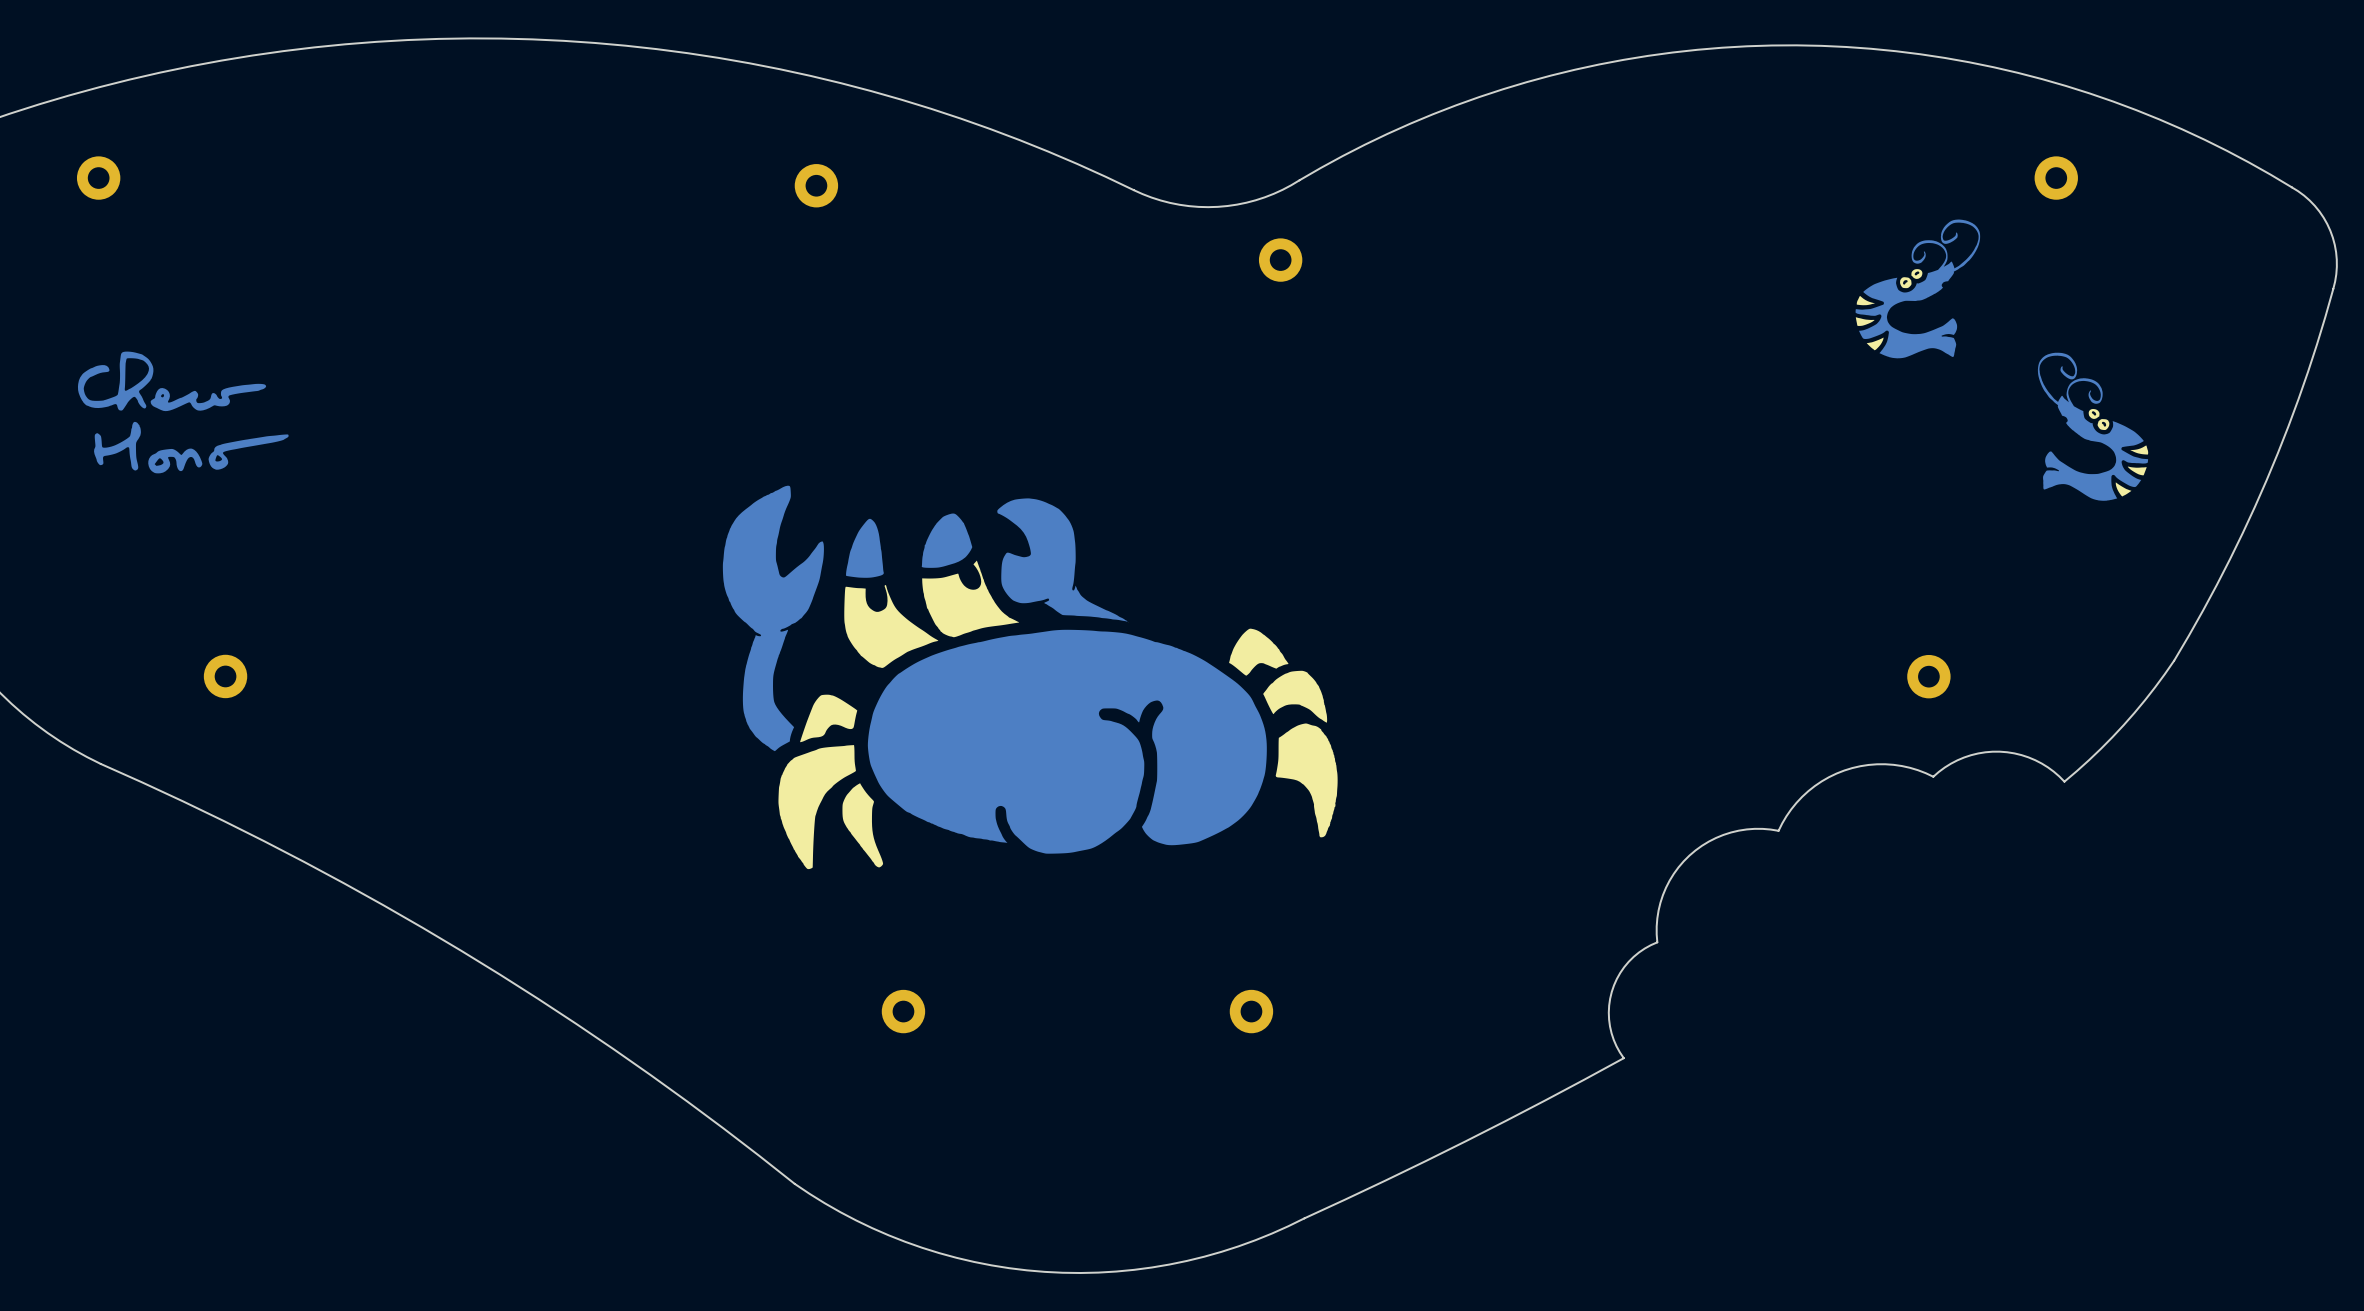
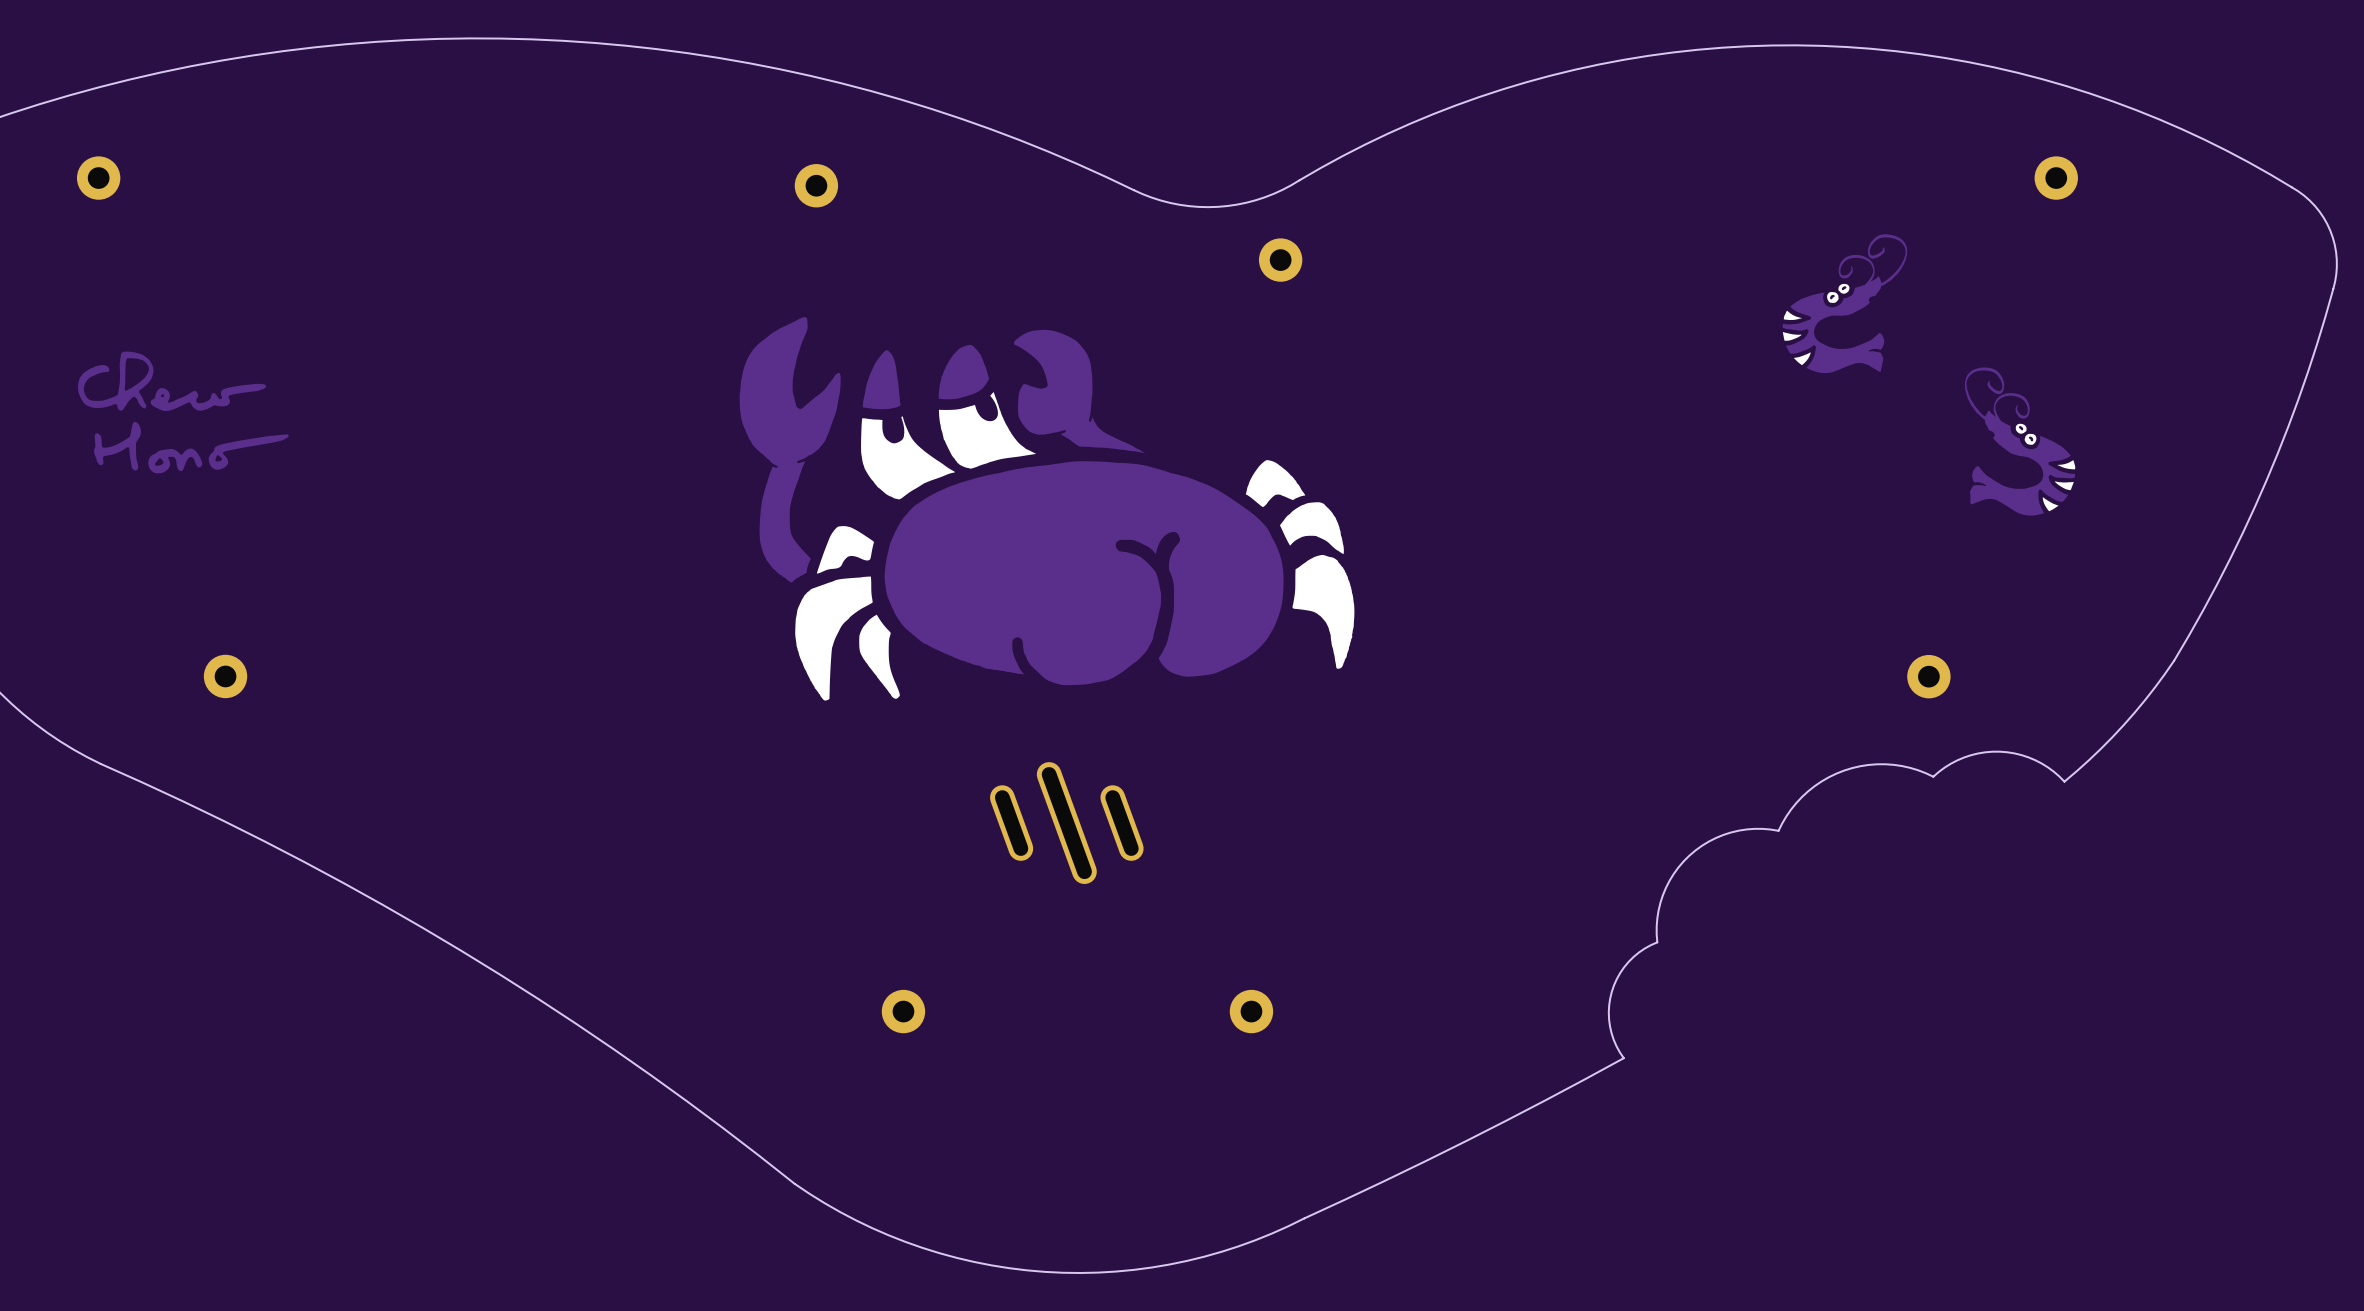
drawing position: (1917, 288) -> (1844, 303)
drawing position: (2093, 426) -> (2020, 441)
drawing position: (1030, 677) -> (1047, 508)
part: none -> (1011, 823)
part: none -> (1066, 823)
part: none -> (1122, 823)

